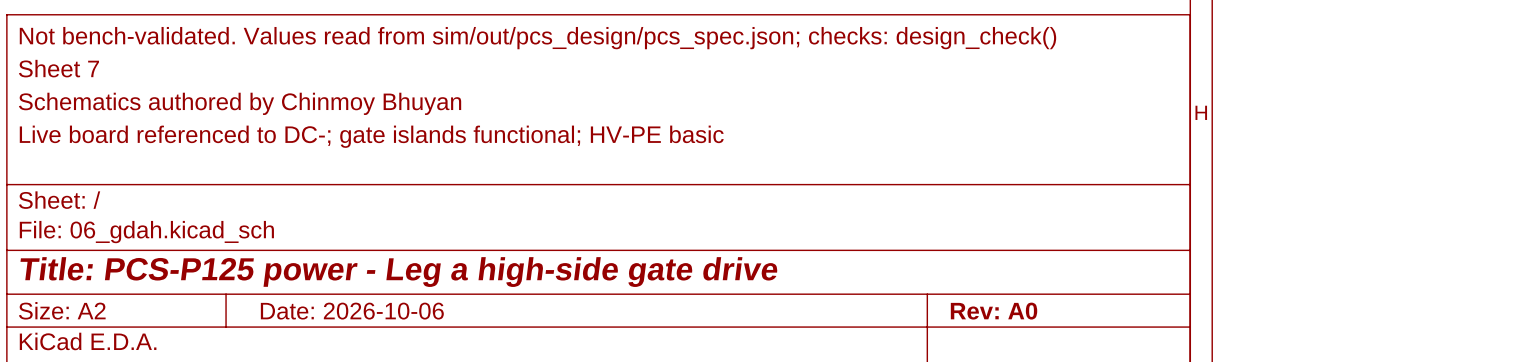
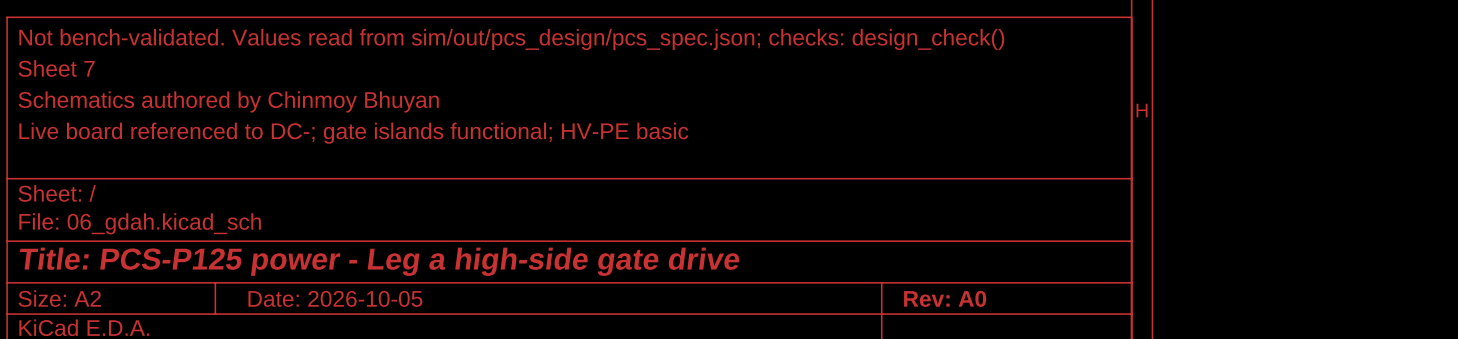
title block: Date: 2026-10-06 (352, 311) -> Date: 2026-10-05 (335, 298)

